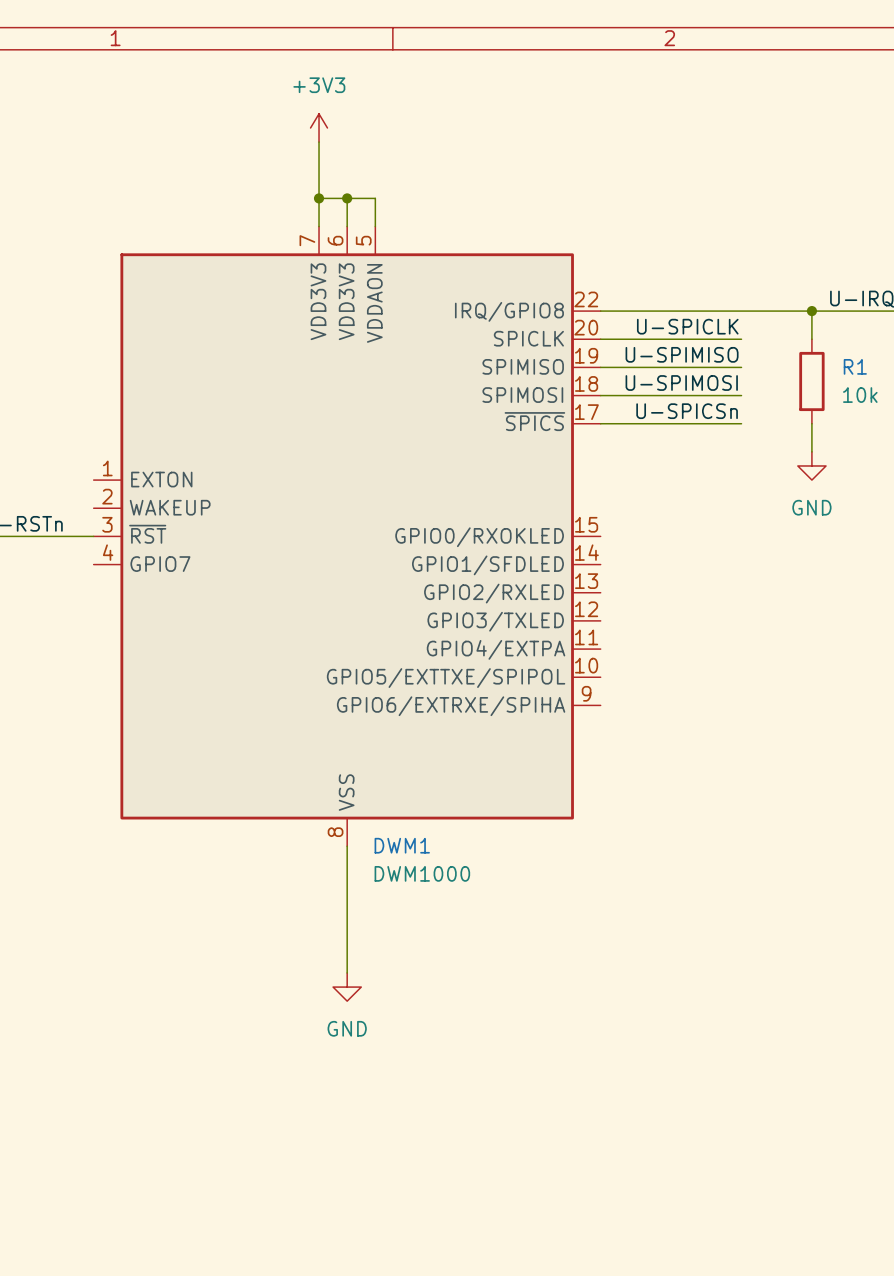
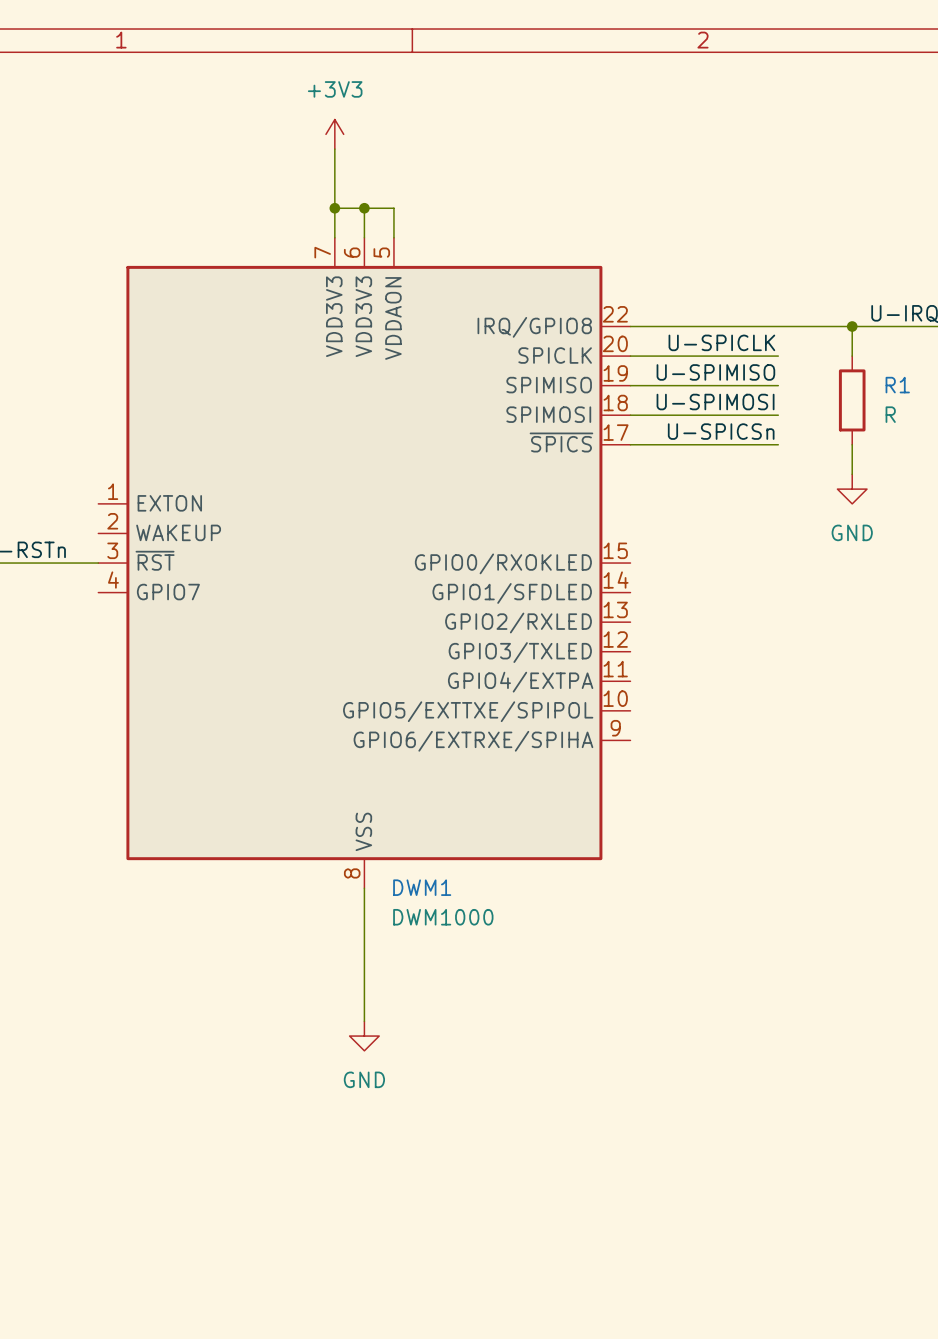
R1 value: 10k (860, 395) -> R (890, 414)

